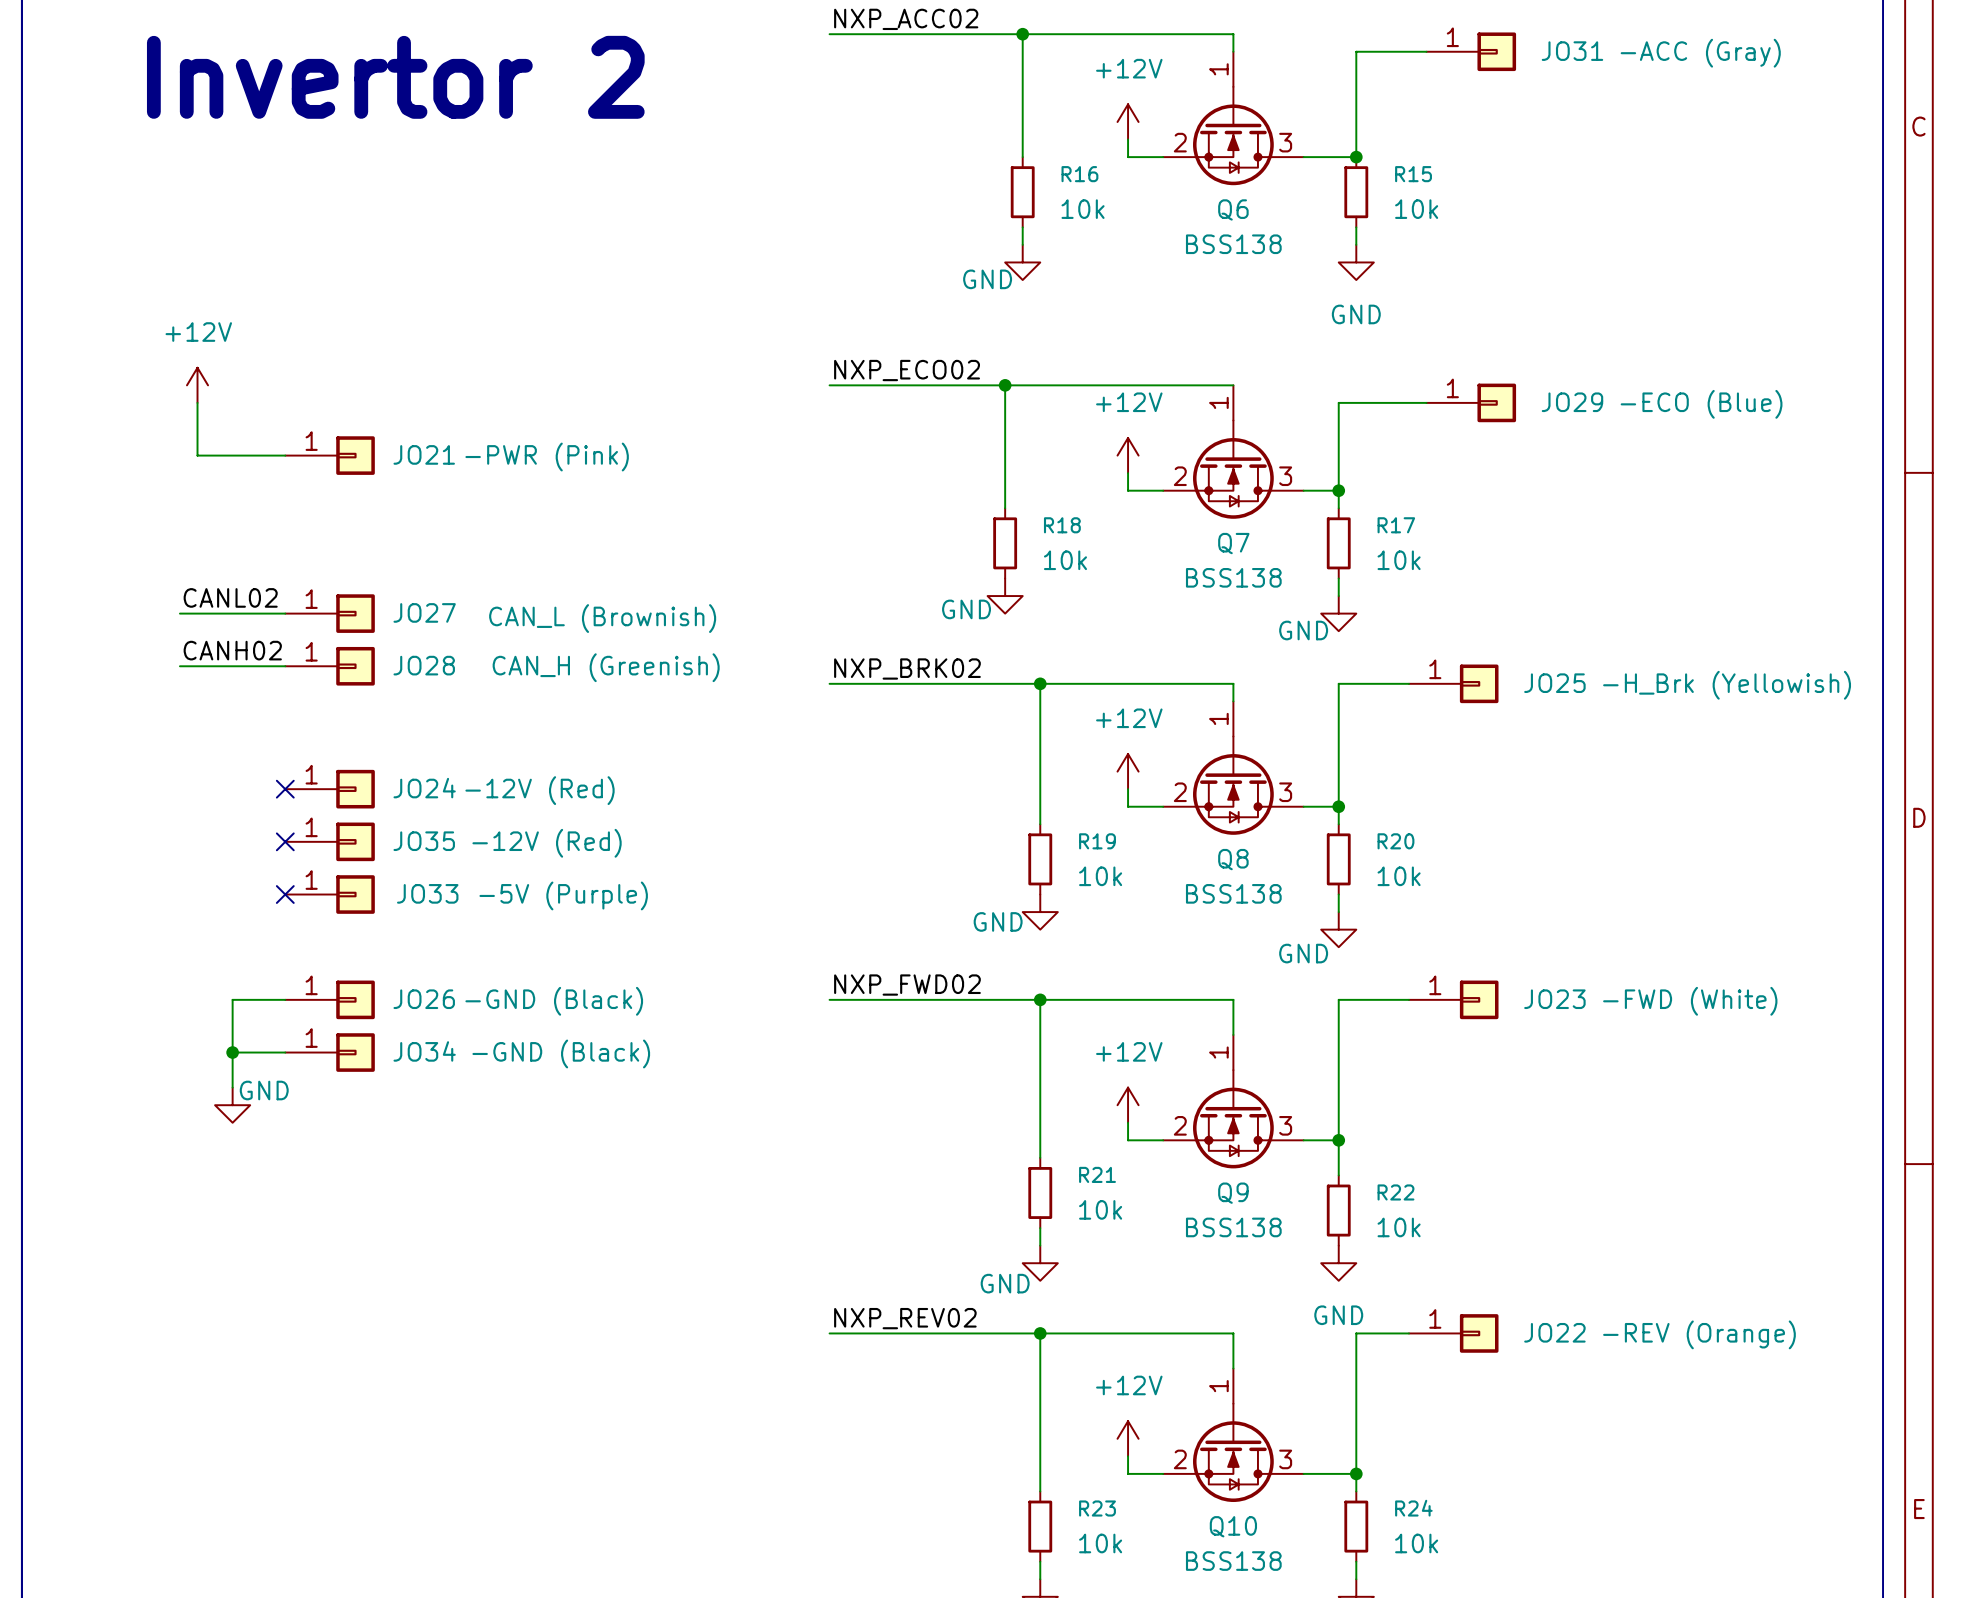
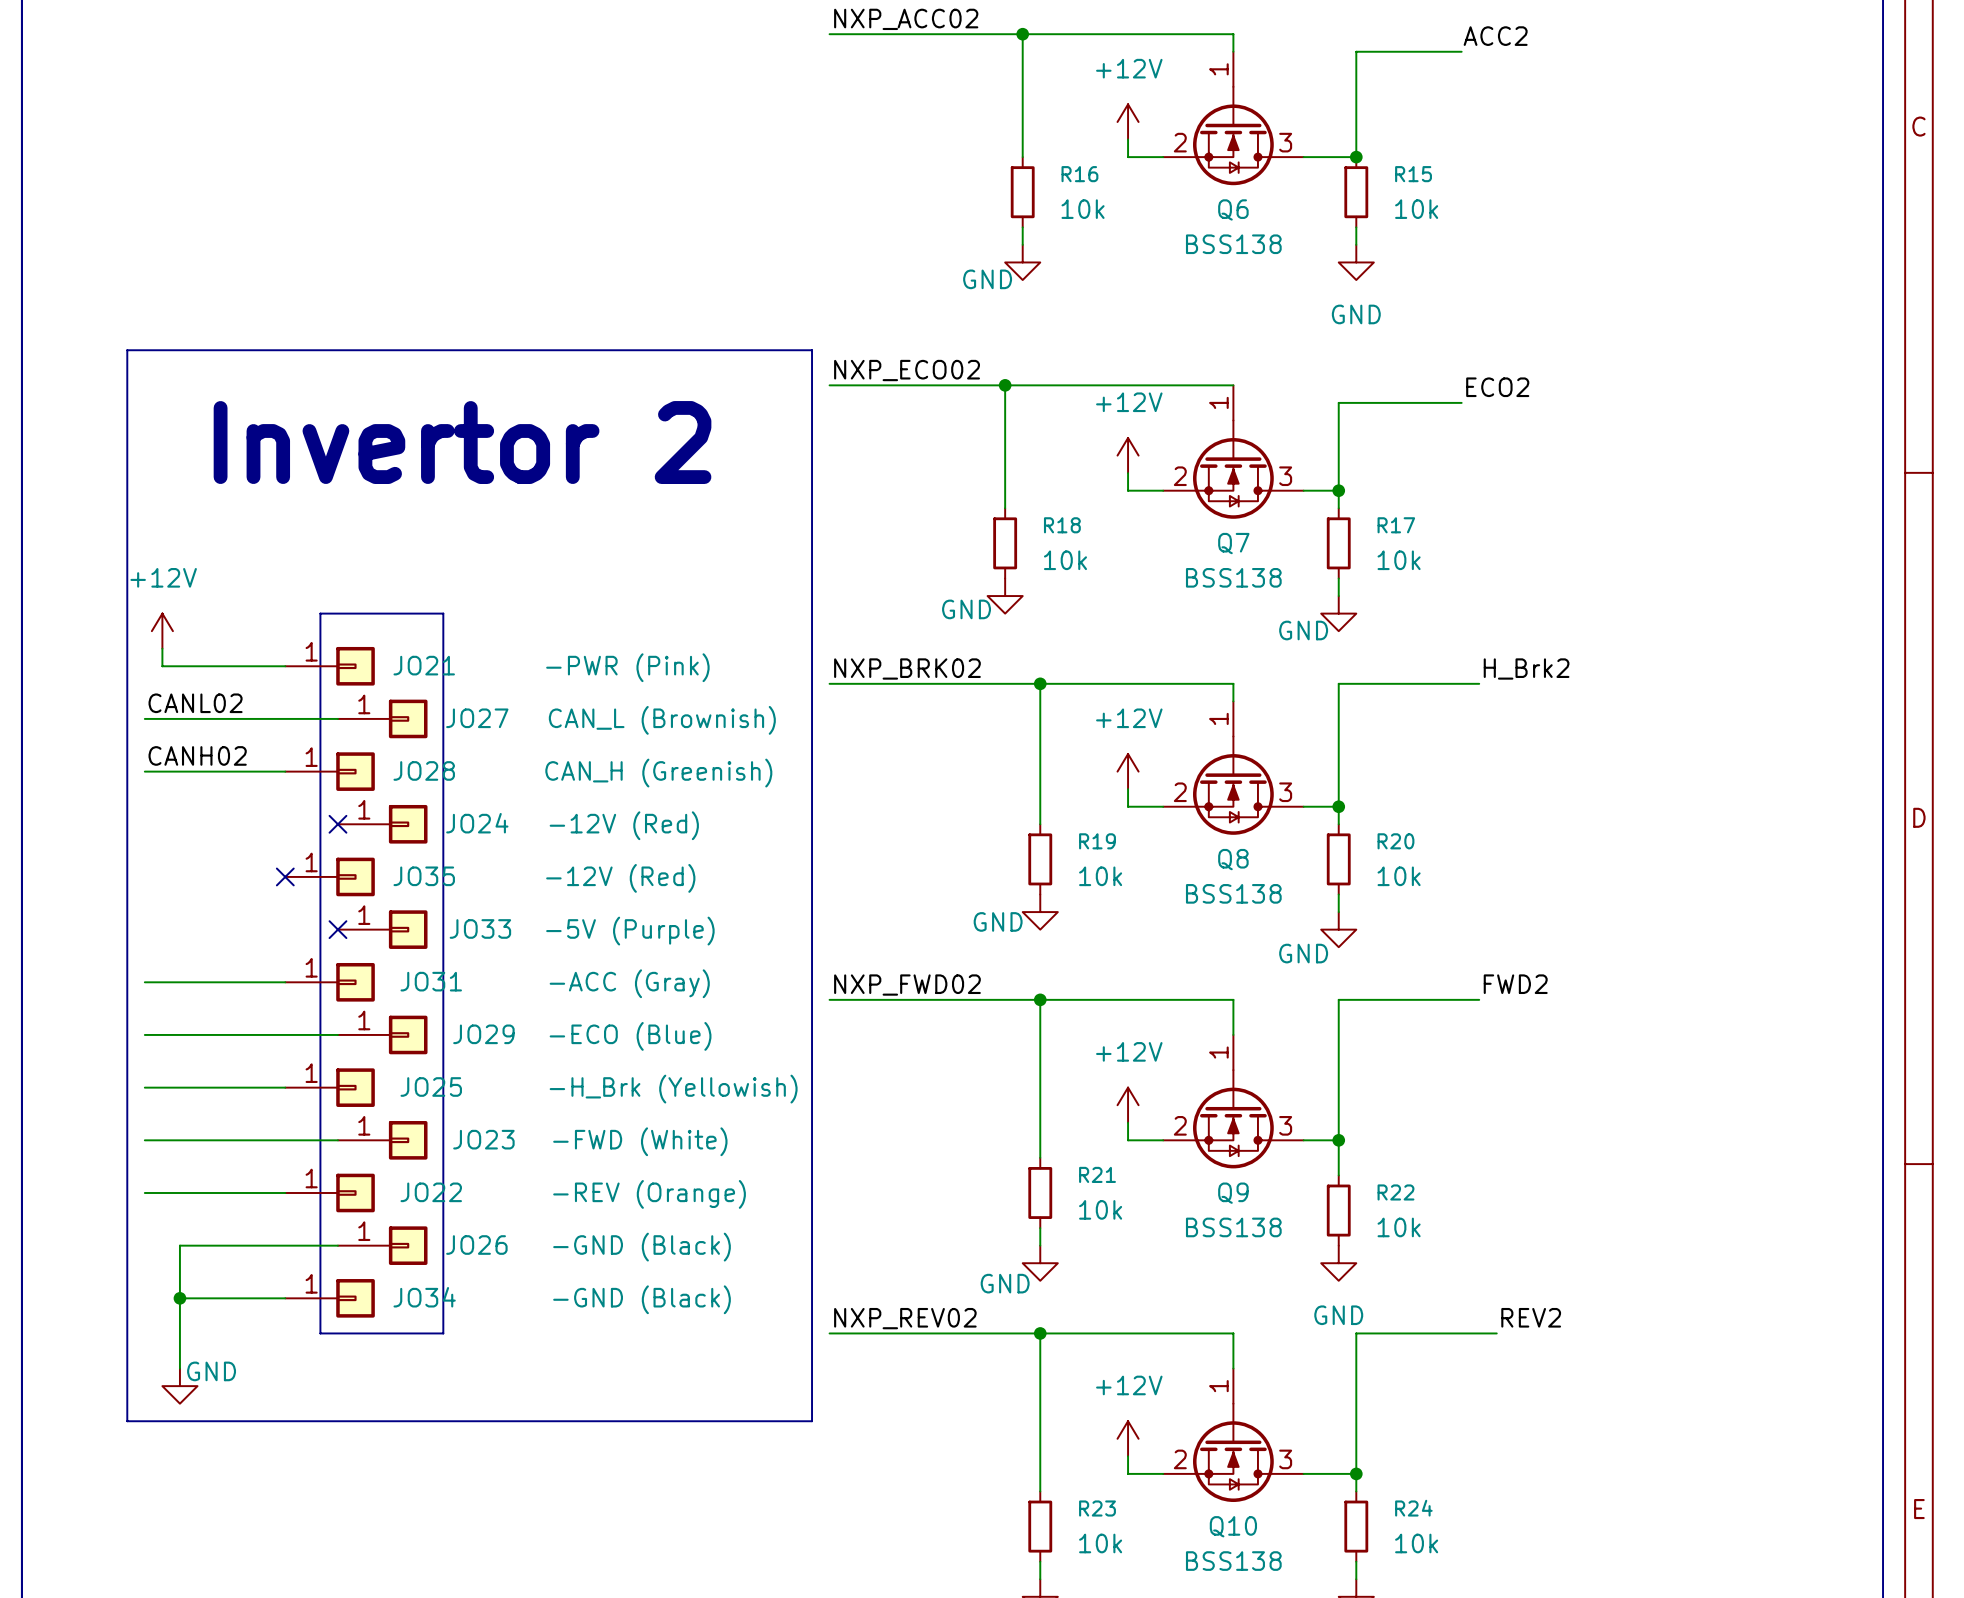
label: none -> ACC2 (1495, 36)
JO31 position: (1471, 51) -> (330, 982)
JO31 value position: -ACC (Gray) (1700, 53) -> -ACC (Gray) (629, 983)
text: Invertor 2 (395, 77) -> none
line: none -> (127, 350) (812, 350) (812, 1421) (127, 1421) (127, 350)
power symbol position: +12V (197, 385) -> +12V (162, 631)
label: none -> ECO2 (1497, 387)
wire: (197, 402) (197, 455) (285, 455) -> none
JO29 position: (1471, 402) -> (382, 1034)
JO29 value position: -ECO (Blue) (1701, 404) -> -ECO (Blue) (630, 1036)
text: none -> Invertor 2 (462, 442)
JO21: -PWR (Pink) (330, 455) -> none
label position: CANL02 (230, 597) -> CANL02 (195, 703)
wire: (179, 613) (285, 613) -> none
line: none -> (320, 613) (443, 613) (443, 1333) (320, 1333) (320, 613)
JO27 position: (330, 613) -> (382, 718)
JO27 value position: CAN_L (Brownish) (602, 618) -> CAN_L (Brownish) (662, 720)
wire: none -> (162, 648) (162, 666) (179, 666)
label position: CANH02 (232, 650) -> CANH02 (197, 755)
JO28 name: JO28 (424, 665) -> JO21 (424, 665)
JO28 value: CAN_H (Greenish) (606, 667) -> -PWR (Pink) (627, 667)
label: none -> H_Brk2 (1526, 668)
JO25 position: (1453, 683) -> (330, 1087)
JO25 value position: -H_Brk (Yellowish) (1727, 685) -> -H_Brk (Yellowish) (673, 1089)
wire: none -> (144, 718) (337, 718)
wire: none -> (144, 771) (285, 771)
JO28: none -> CAN_H (Greenish) (330, 771)
no-connect mark: (285, 789) -> none
JO24 position: (330, 789) -> (382, 824)
JO24 value position: -12V (Red) (540, 790) -> -12V (Red) (624, 825)
no-connect mark: none -> (337, 824)
no-connect mark: (285, 841) -> none
JO35 position: (330, 841) -> (330, 876)
JO35 value position: -12V (Red) (547, 843) -> -12V (Red) (620, 878)
no-connect mark: none -> (285, 876)
no-connect mark: (285, 894) -> none
JO33 position: (330, 894) -> (382, 929)
JO33 value position: -5V (Purple) (563, 895) -> -5V (Purple) (630, 931)
no-connect mark: none -> (337, 929)
wire: none -> (144, 982) (285, 982)
label: none -> FWD2 (1515, 984)
wire: (285, 999) (232, 999) (232, 1087) -> none
JO26 position: (330, 999) -> (382, 1245)
JO23 position: (1453, 999) -> (382, 1140)
JO26 value position: -GND (Black) (554, 1001) -> -GND (Black) (642, 1247)
JO23 value position: -FWD (White) (1690, 1001) -> -FWD (White) (640, 1141)
wire: none -> (144, 1034) (337, 1034)
wire: (232, 1052) (285, 1052) -> none
junction: (232, 1052) -> none
JO34 position: (330, 1052) -> (330, 1298)
JO34 value position: -GND (Black) (561, 1053) -> -GND (Black) (642, 1299)
wire: none -> (144, 1087) (285, 1087)
power symbol position: GND (232, 1105) -> GND (179, 1386)
wire: none -> (144, 1140) (337, 1140)
wire: none -> (144, 1192) (285, 1192)
wire: none -> (337, 1245) (179, 1245) (179, 1368)
wire: none -> (179, 1298) (285, 1298)
junction: none -> (179, 1298)
label: none -> REV2 (1531, 1317)
JO22 position: (1453, 1333) -> (330, 1192)
JO22 value position: -REV (Orange) (1699, 1334) -> -REV (Orange) (649, 1194)

